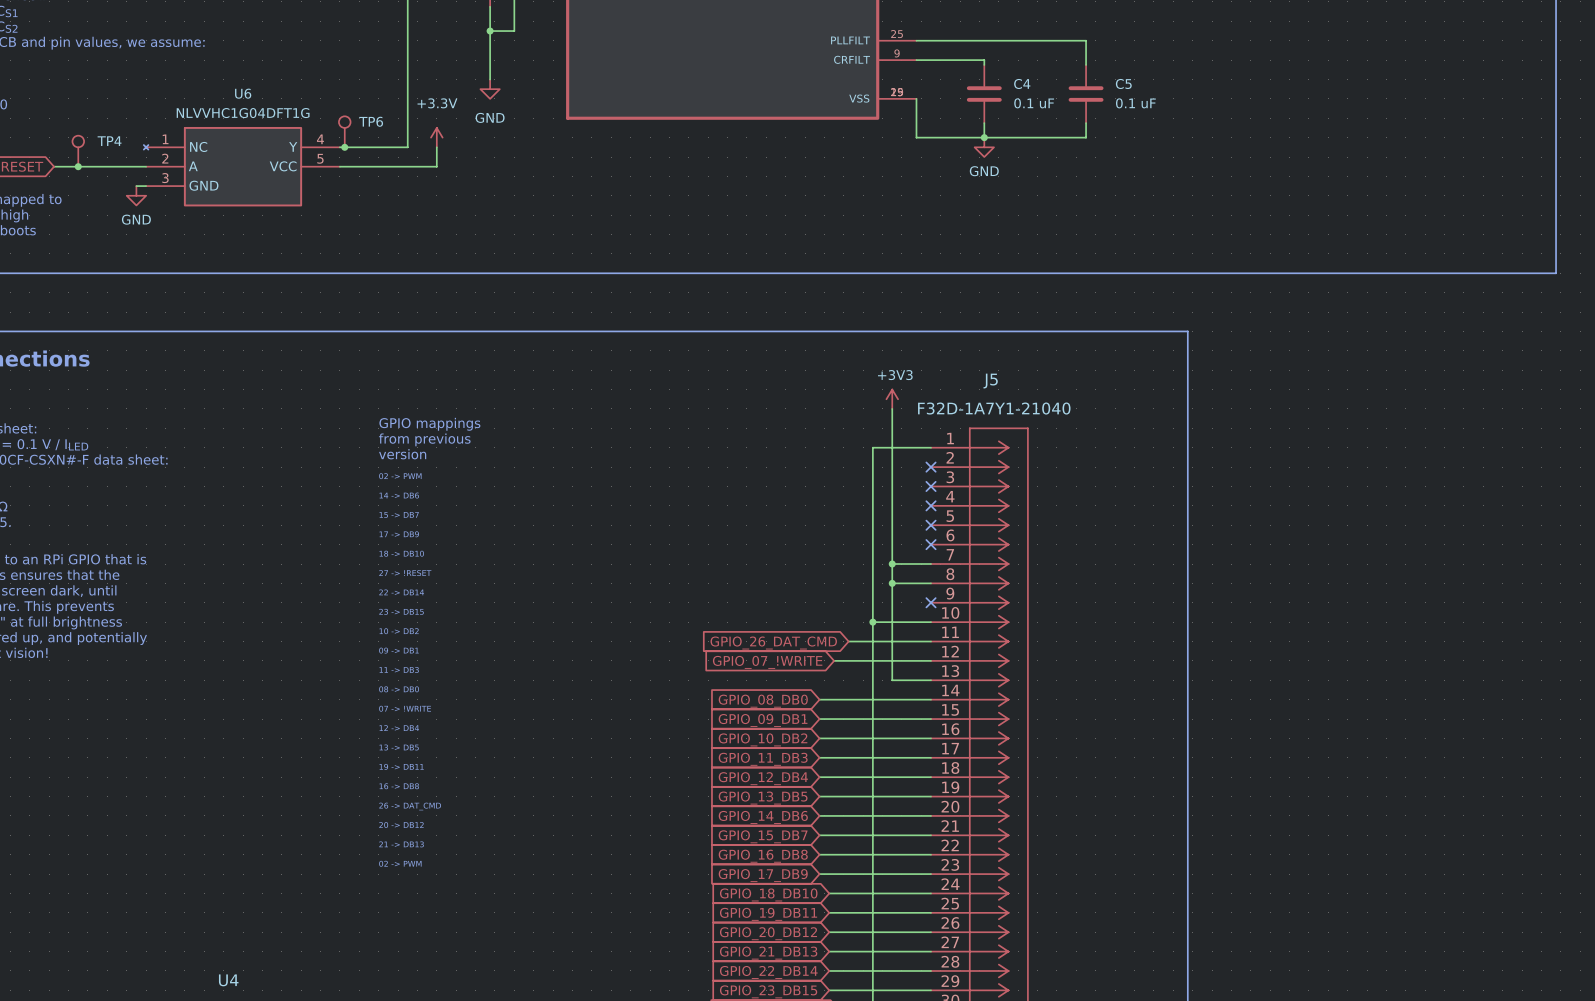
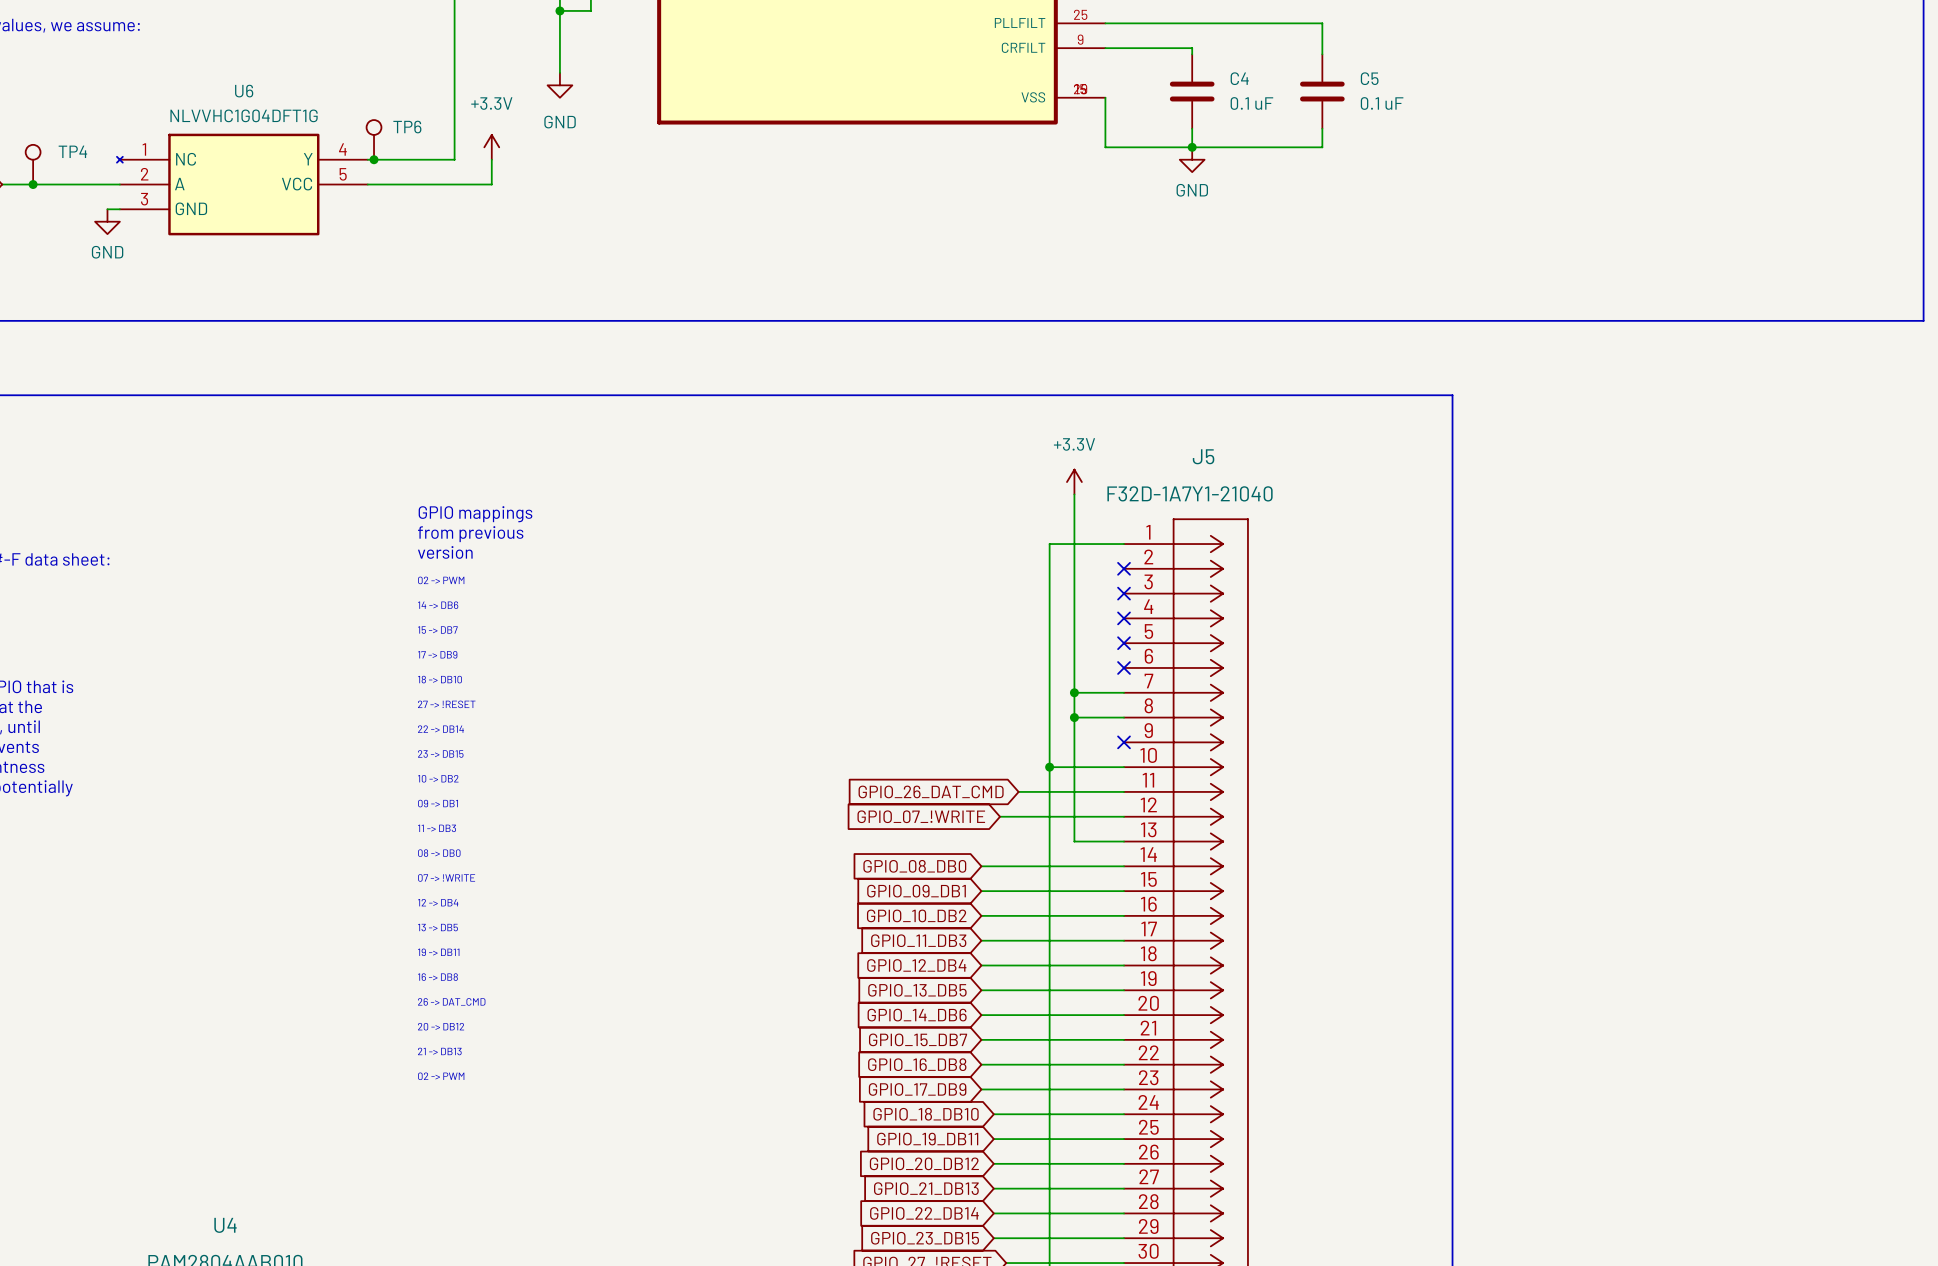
power symbol: +3V3 (892, 399) -> +3.3V (1074, 482)

